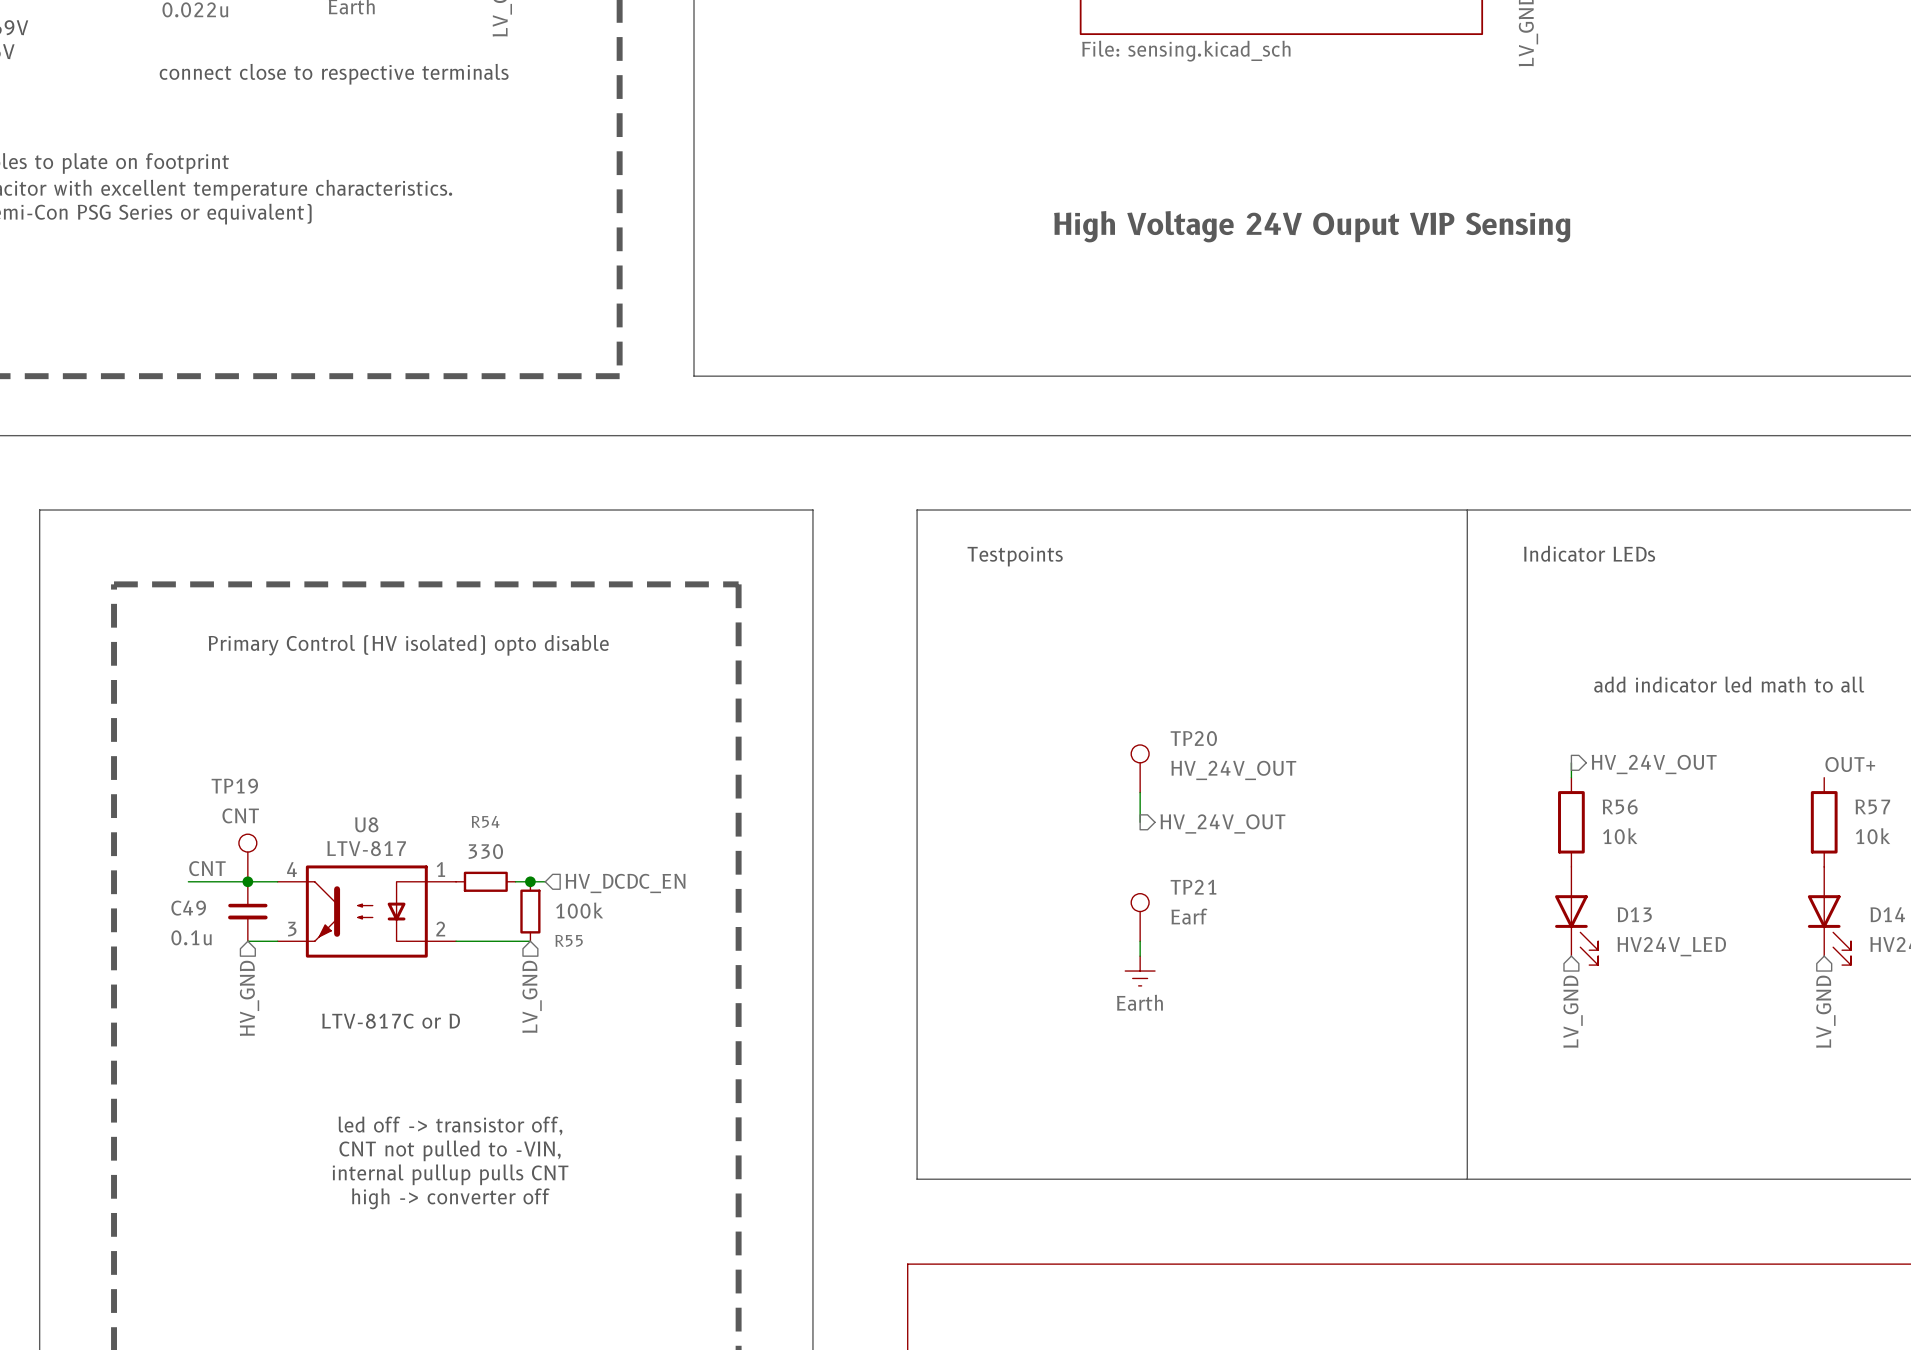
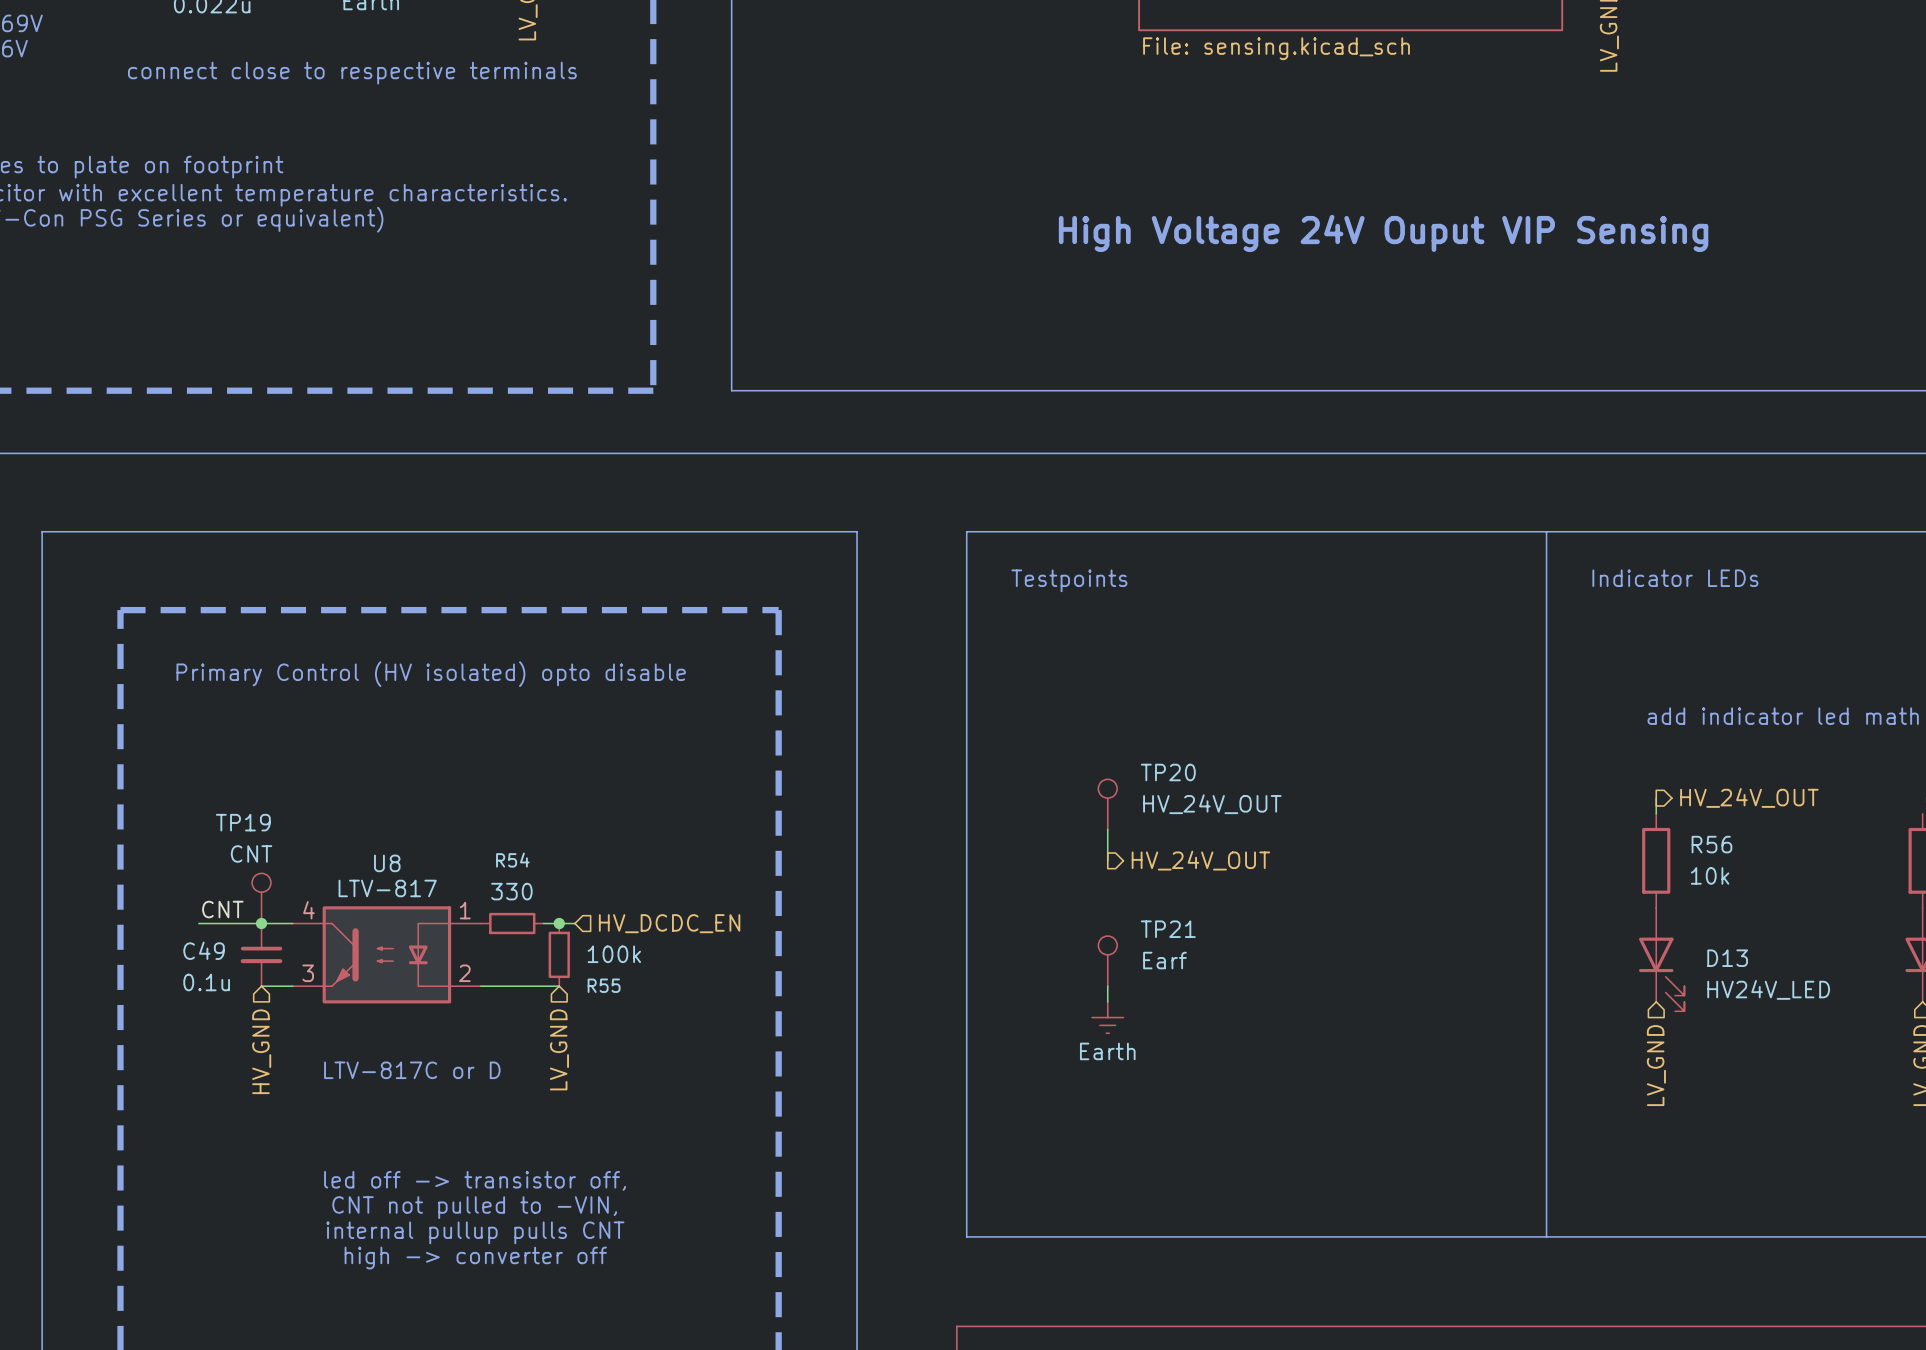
TP20 position: (1140, 768) -> (1107, 804)
wire: (1140, 792) (1140, 822) -> (1107, 829) (1107, 860)
hierarchical label position: HV_24V_OUT (1222, 823) -> HV_24V_OUT (1200, 860)
TP21 position: (1140, 917) -> (1107, 961)
wire: (1140, 941) (1140, 956) -> (1107, 986) (1107, 1001)
power symbol position: Earth (1140, 971) -> Earth (1107, 1017)

